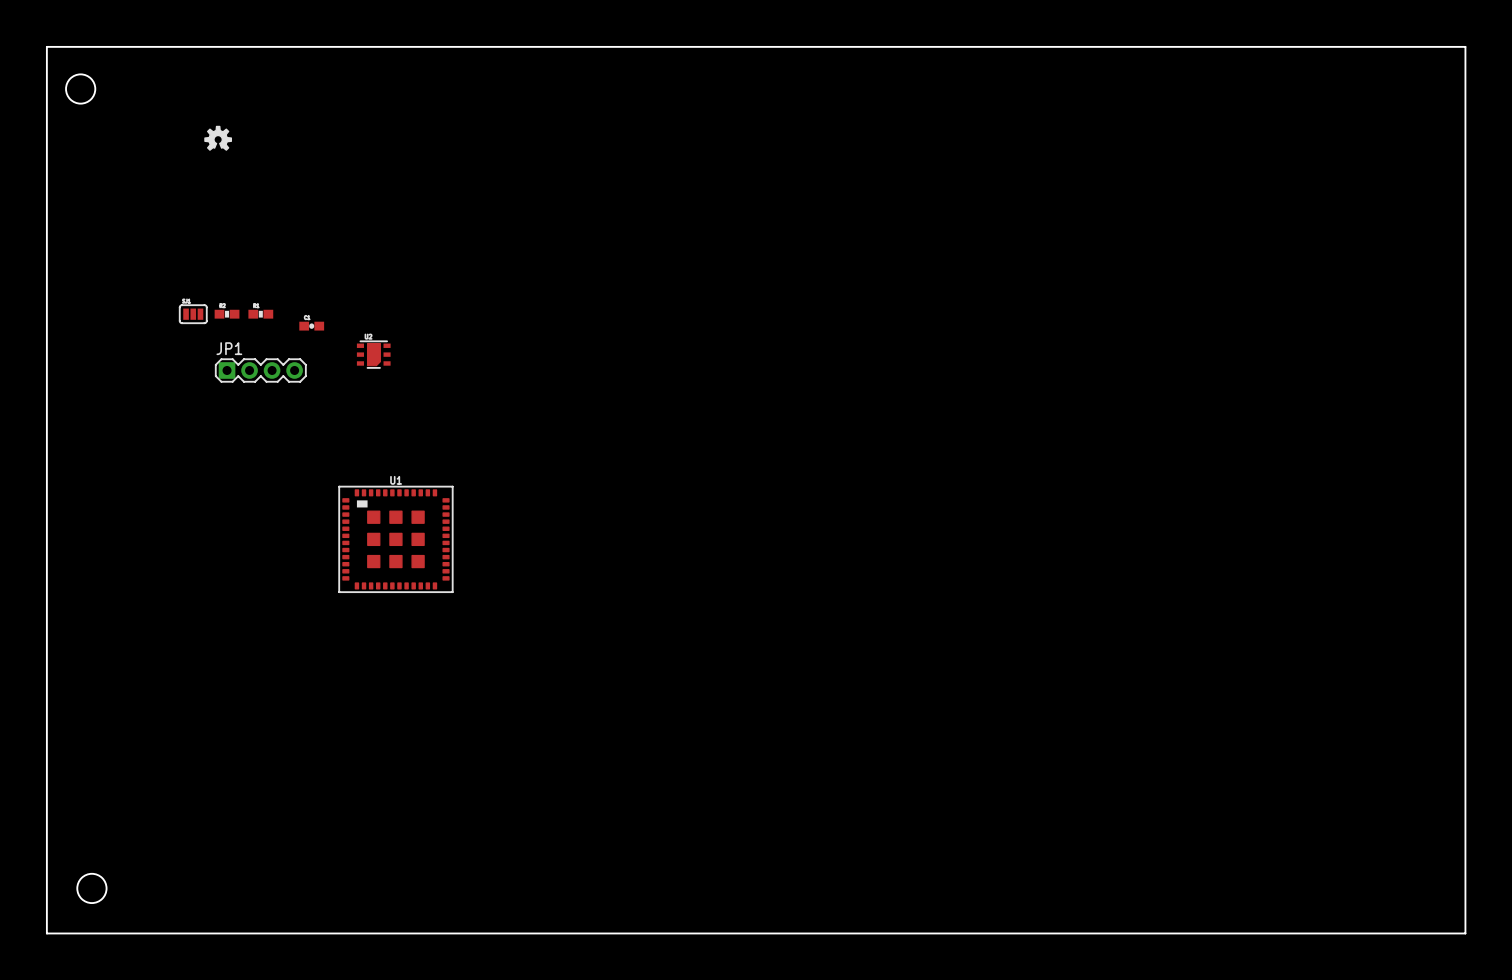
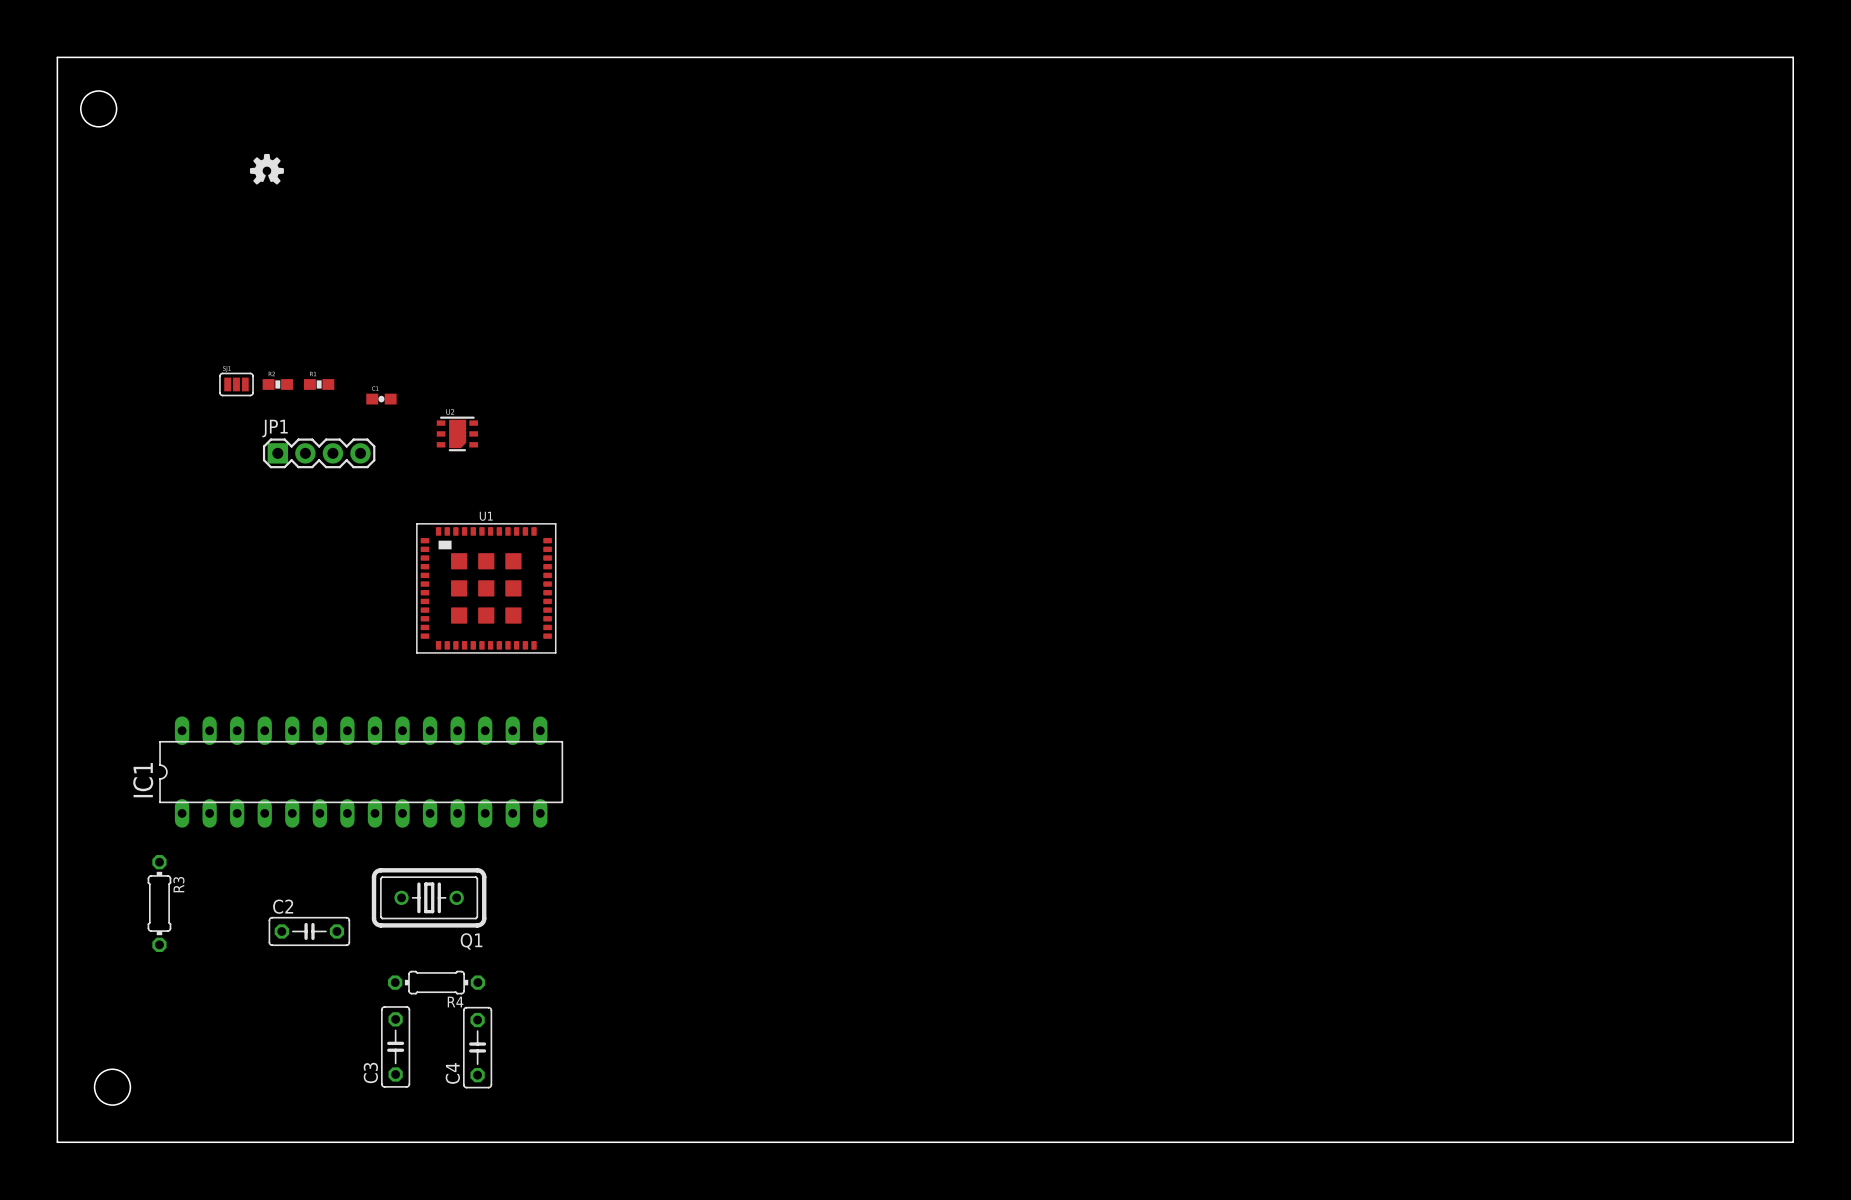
U1 position: (395, 539) -> (486, 588)
IC1: none -> (361, 772)
Q1: none -> (429, 897)
R3: none -> (159, 903)
C2: none -> (309, 931)
R4: none -> (436, 982)
C3: none -> (395, 1046)
C4: none -> (477, 1047)

